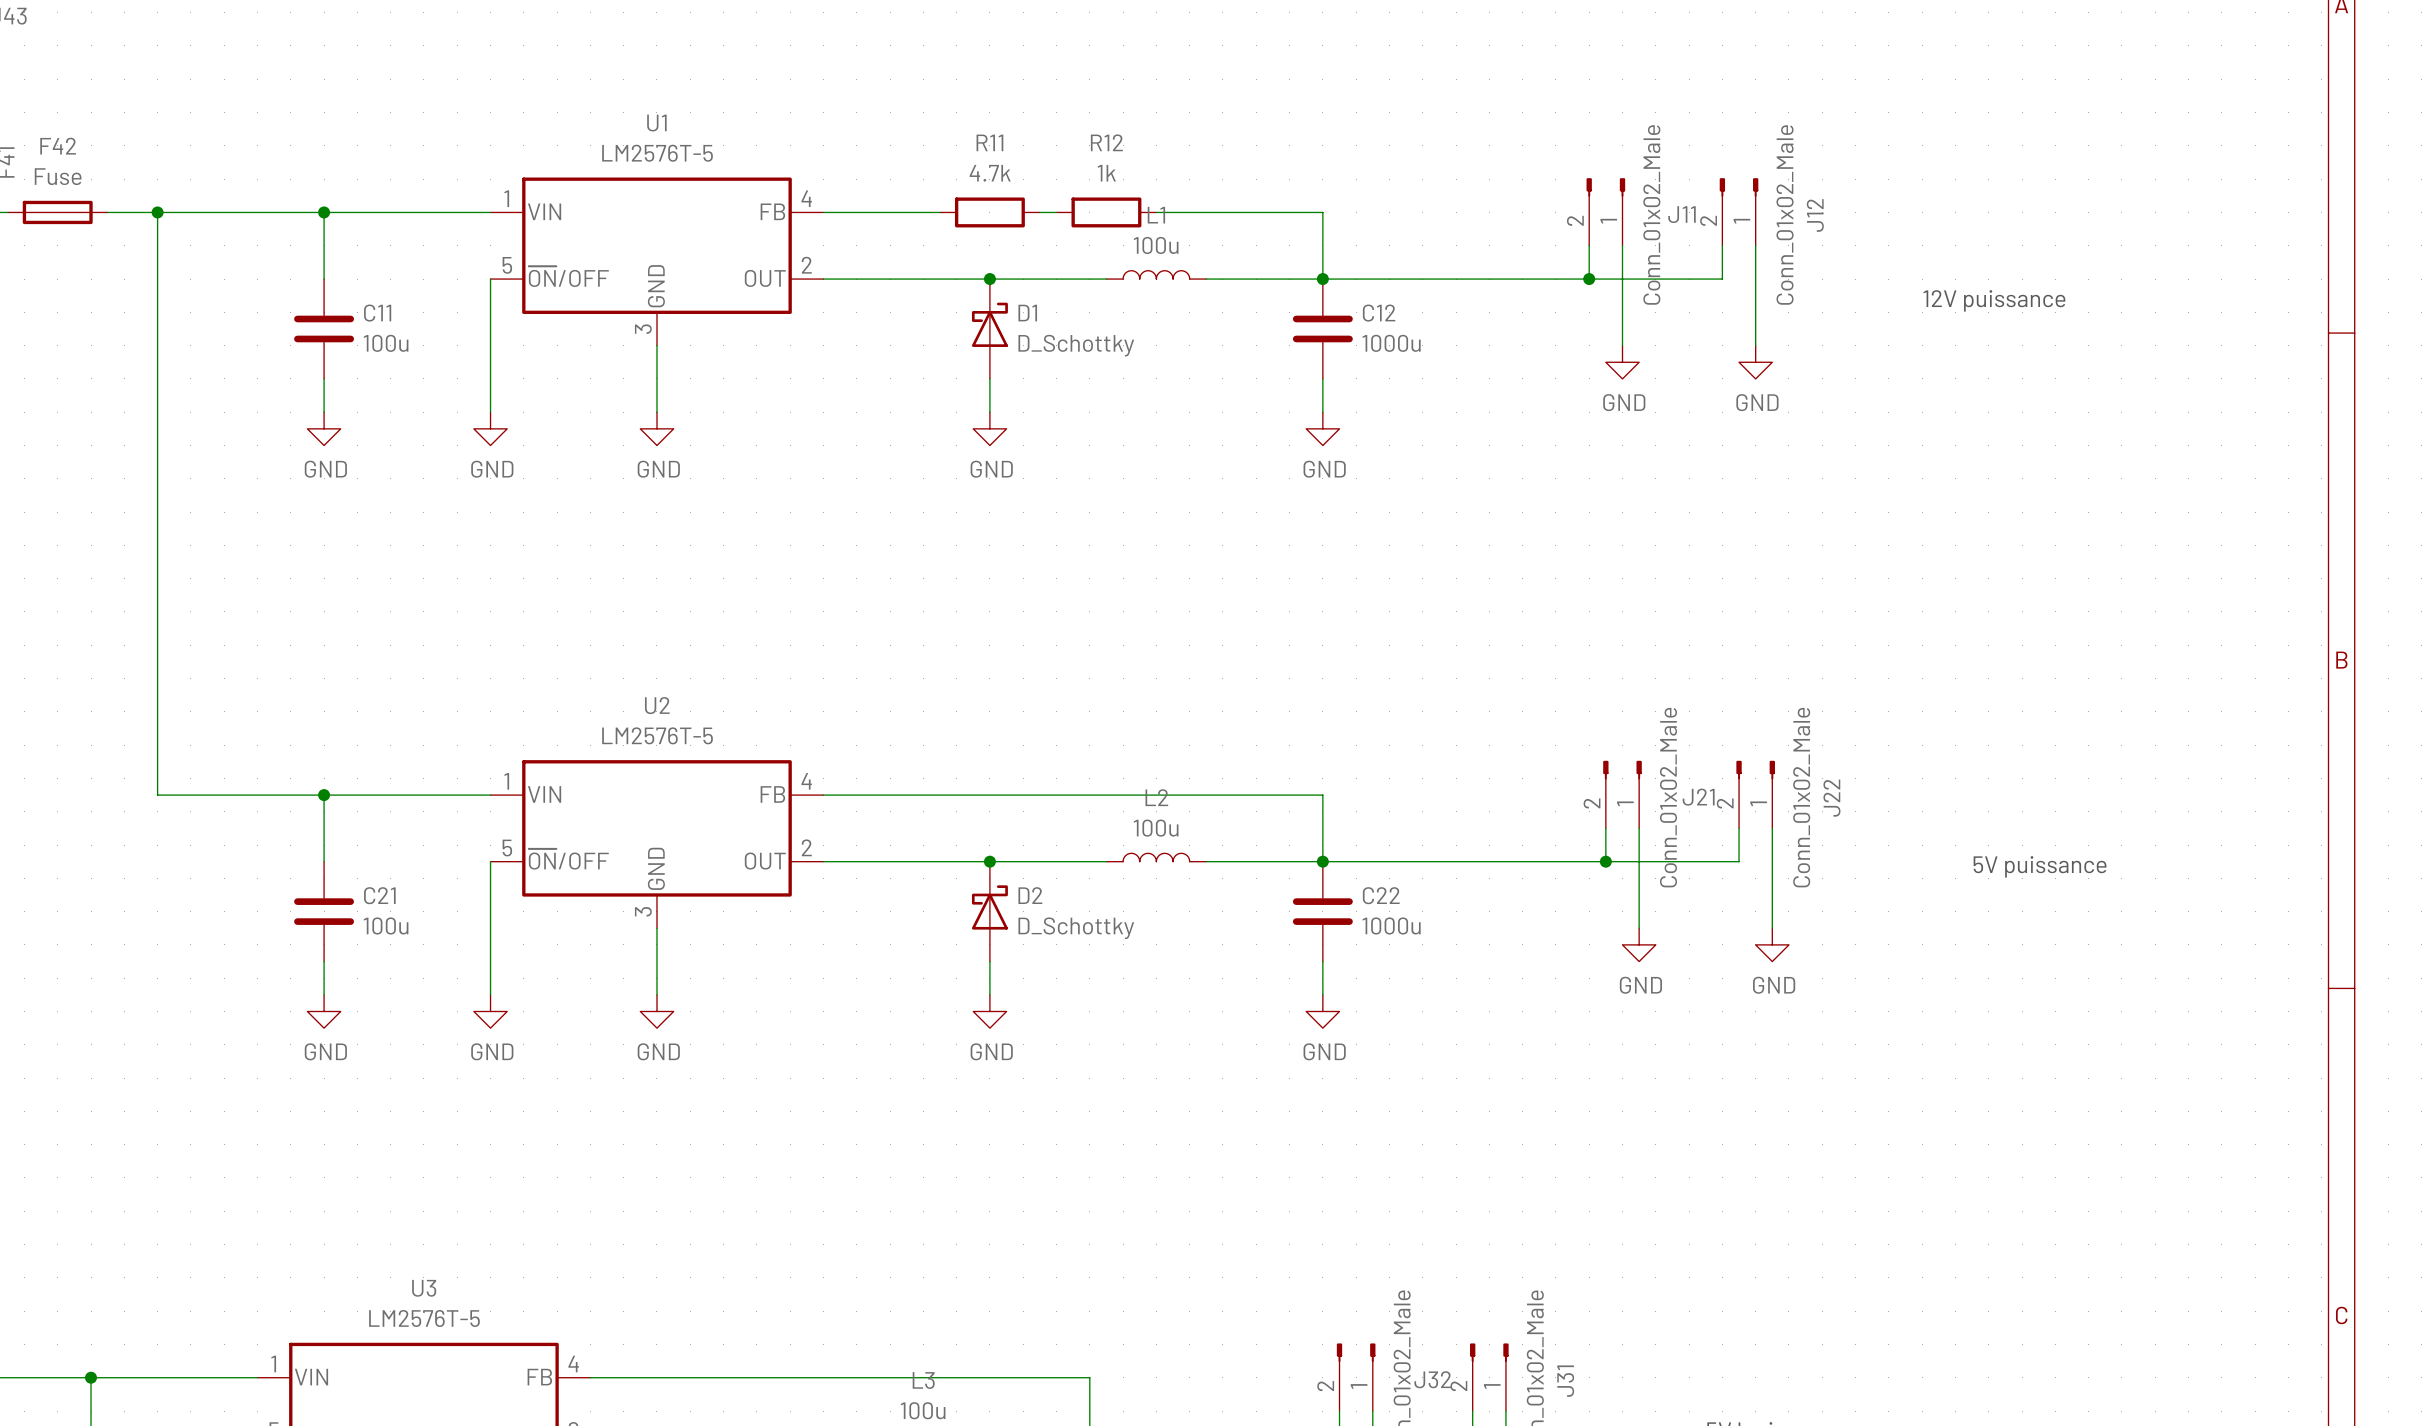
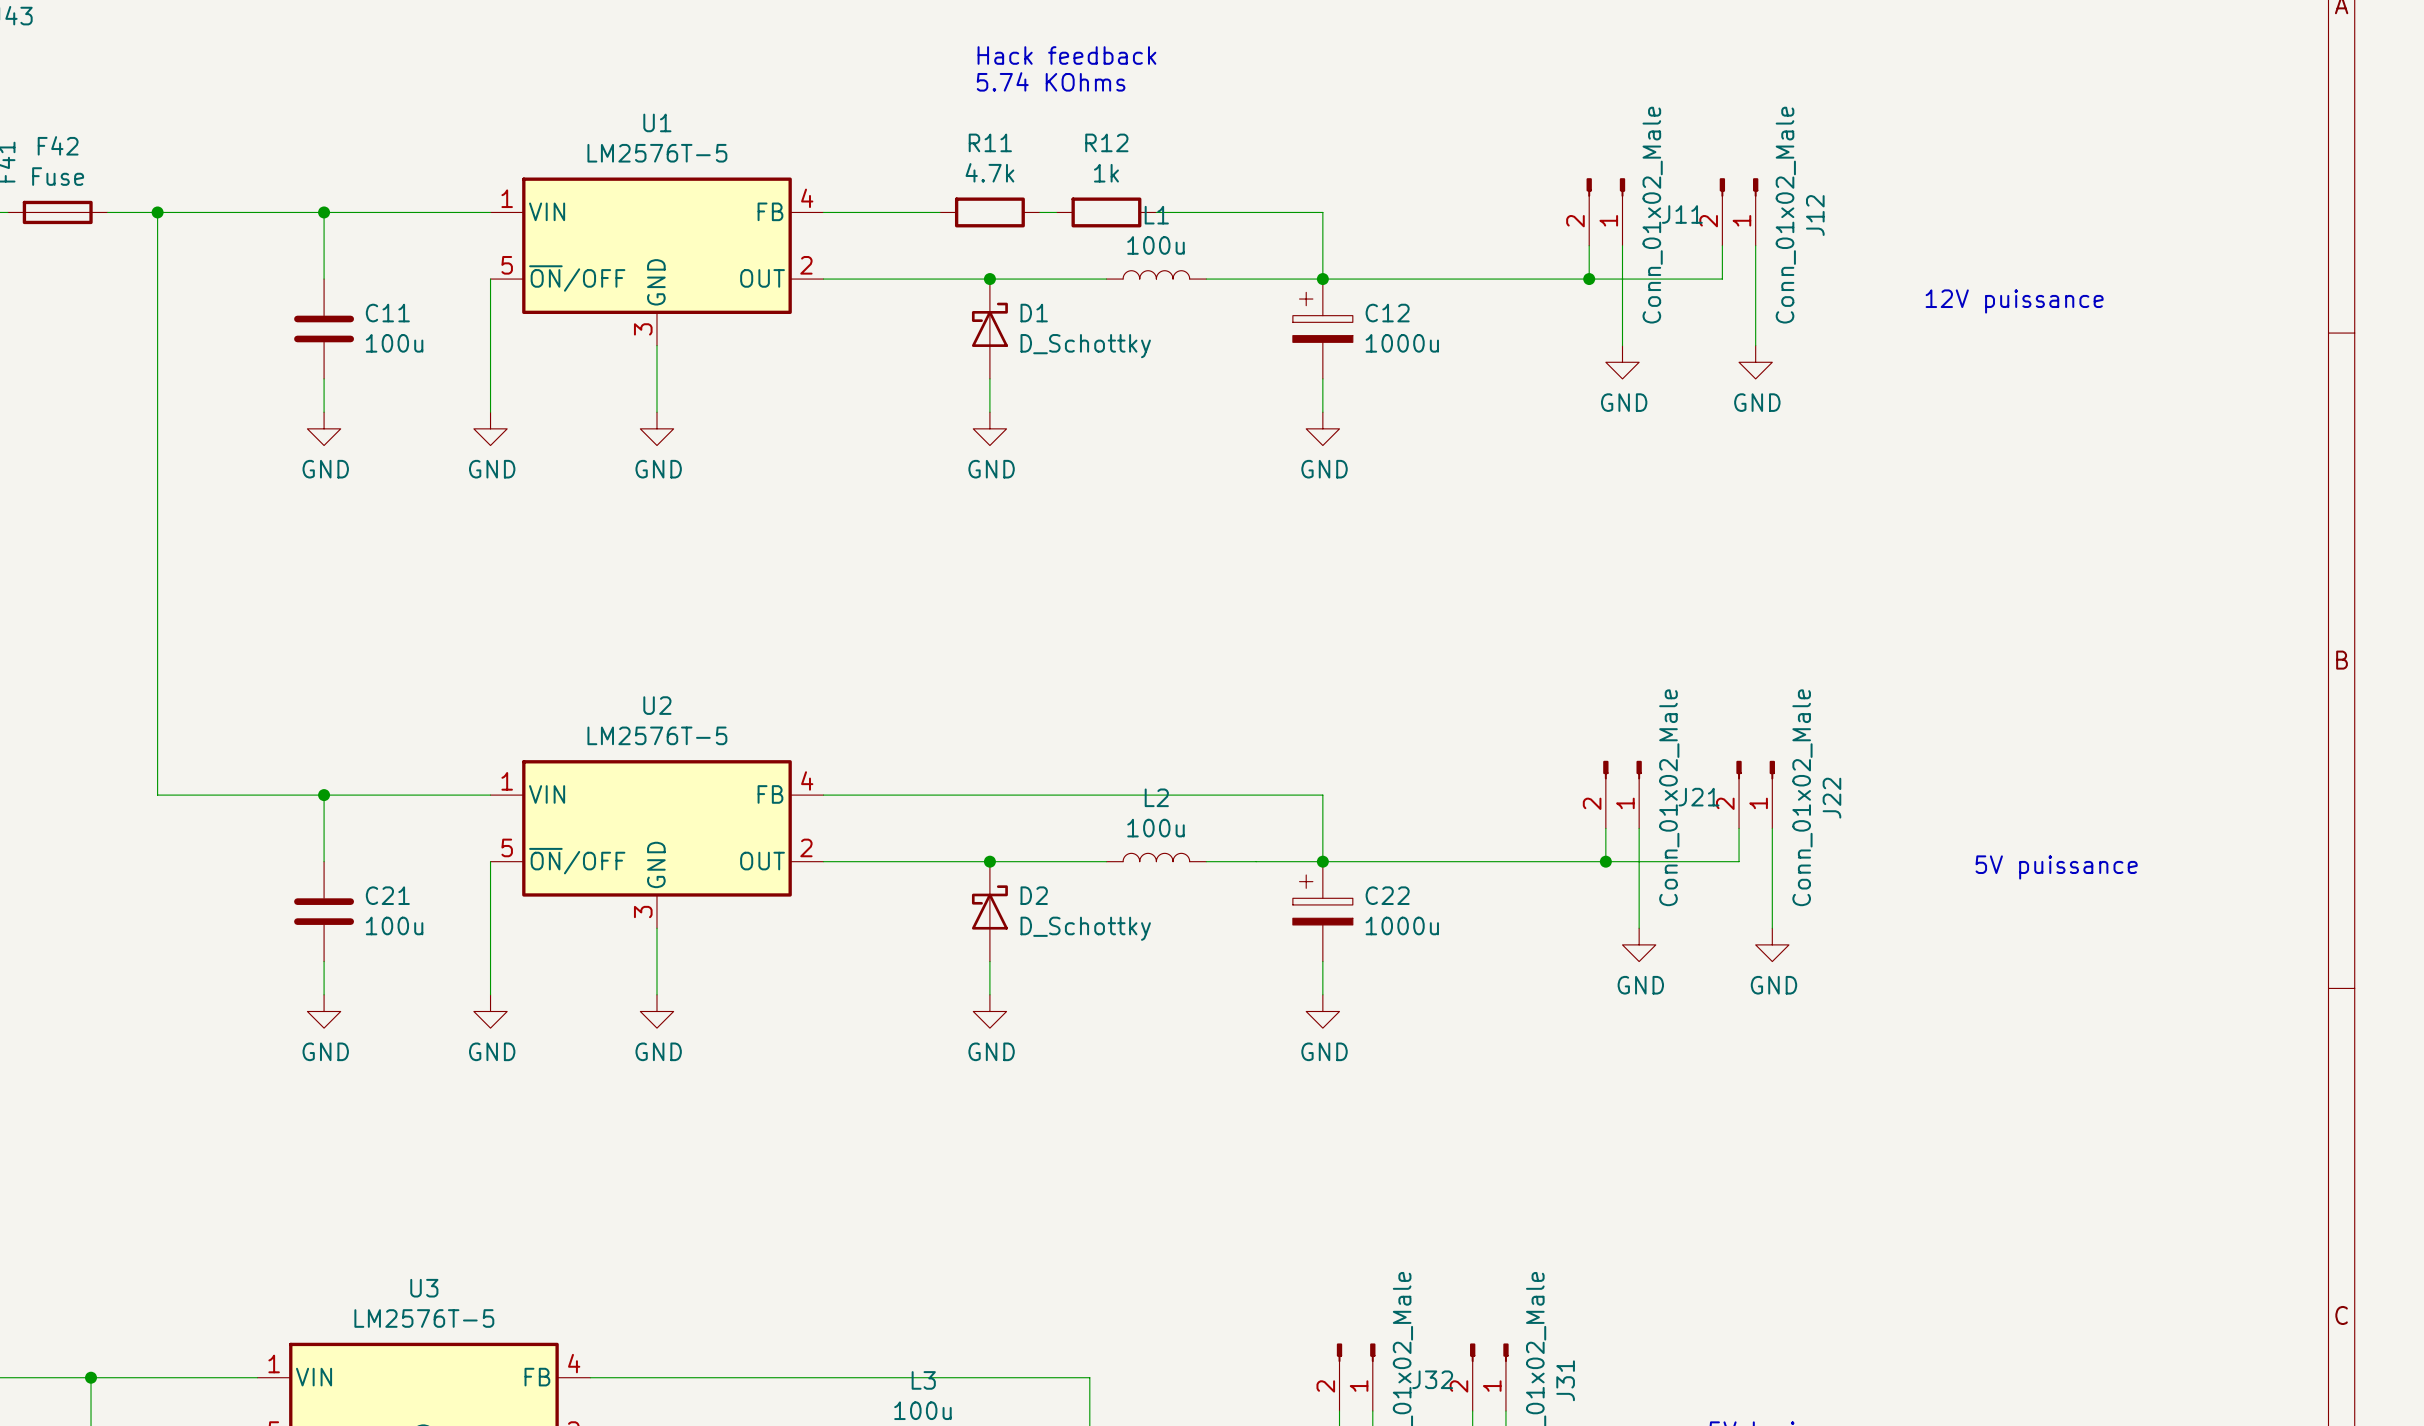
text: none -> Hack feedback (1066, 55)
text: none -> 5.74 KOhms (1051, 81)
C12 symbol: [1292, 279, 1353, 379] -> [1292, 279, 1353, 379]
C22 symbol: [1292, 861, 1353, 962] -> [1292, 861, 1353, 962]

